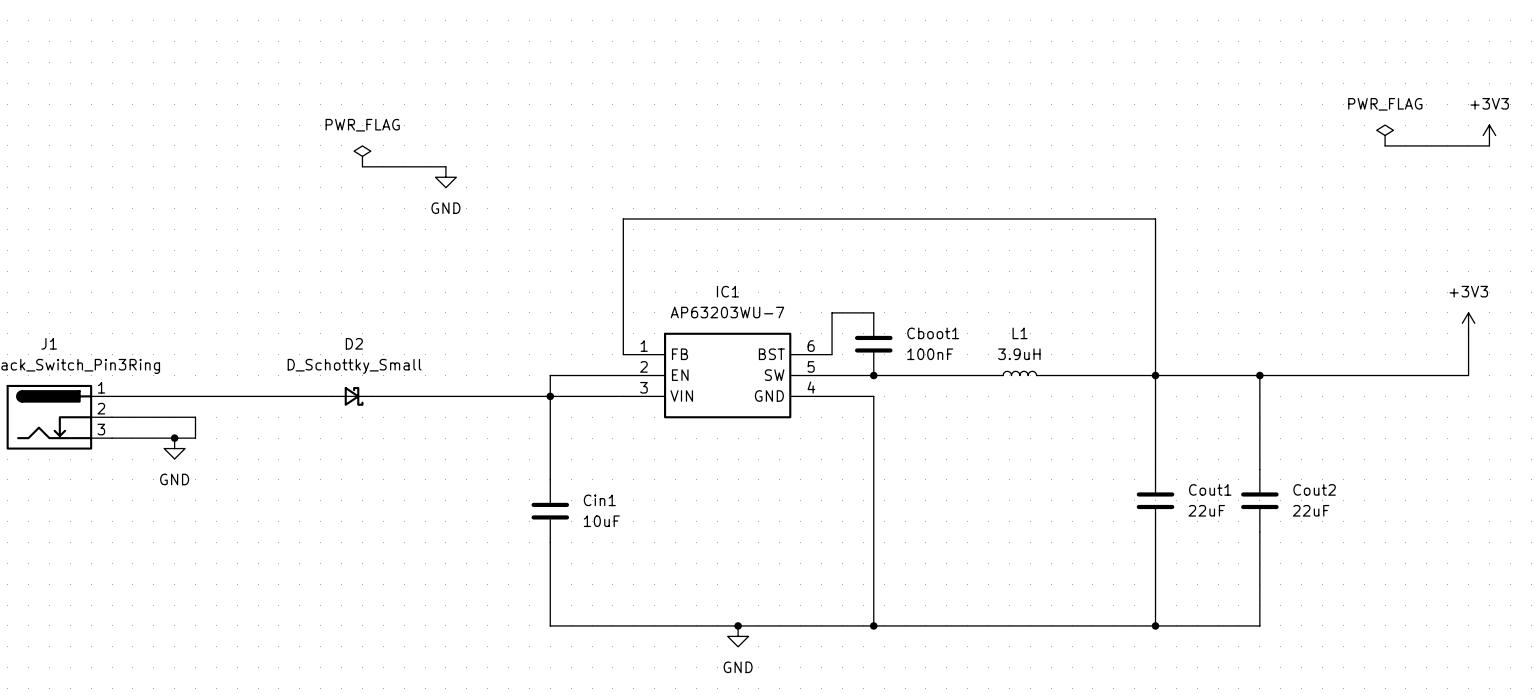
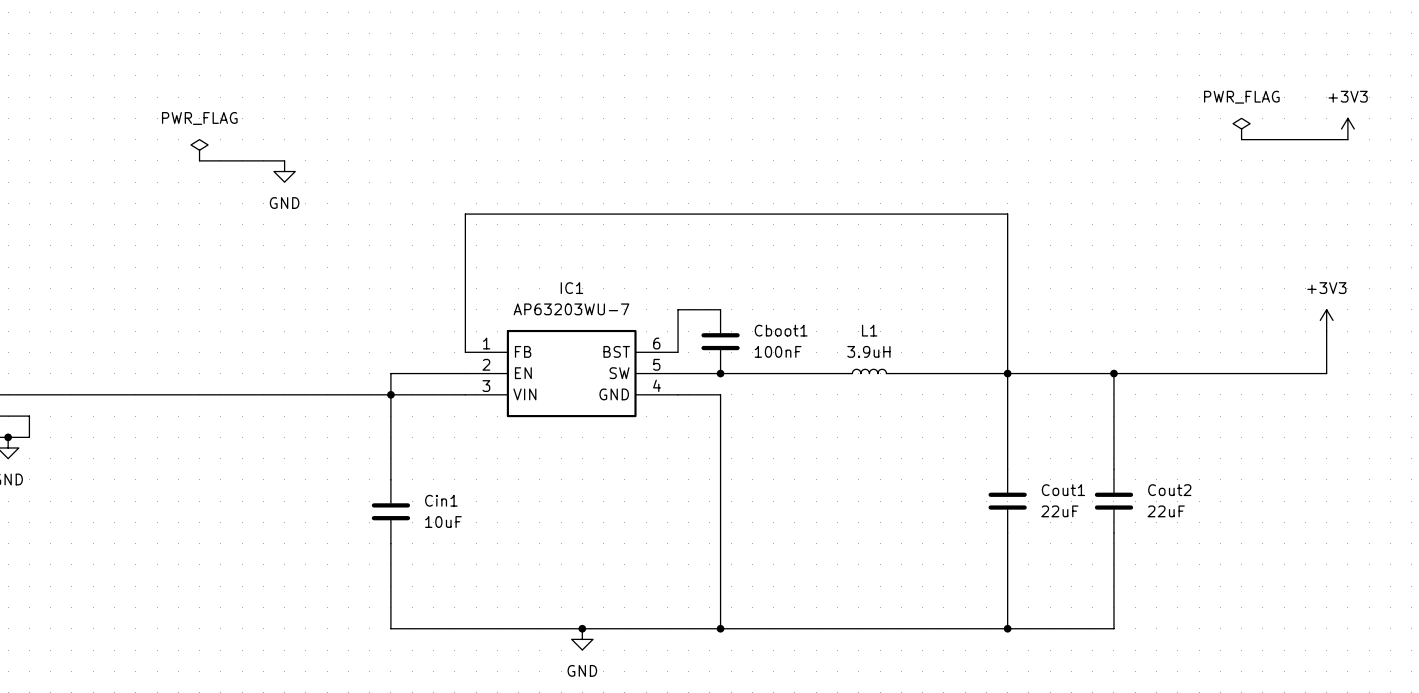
D2: D_Schottky_Small (352, 396) -> none

